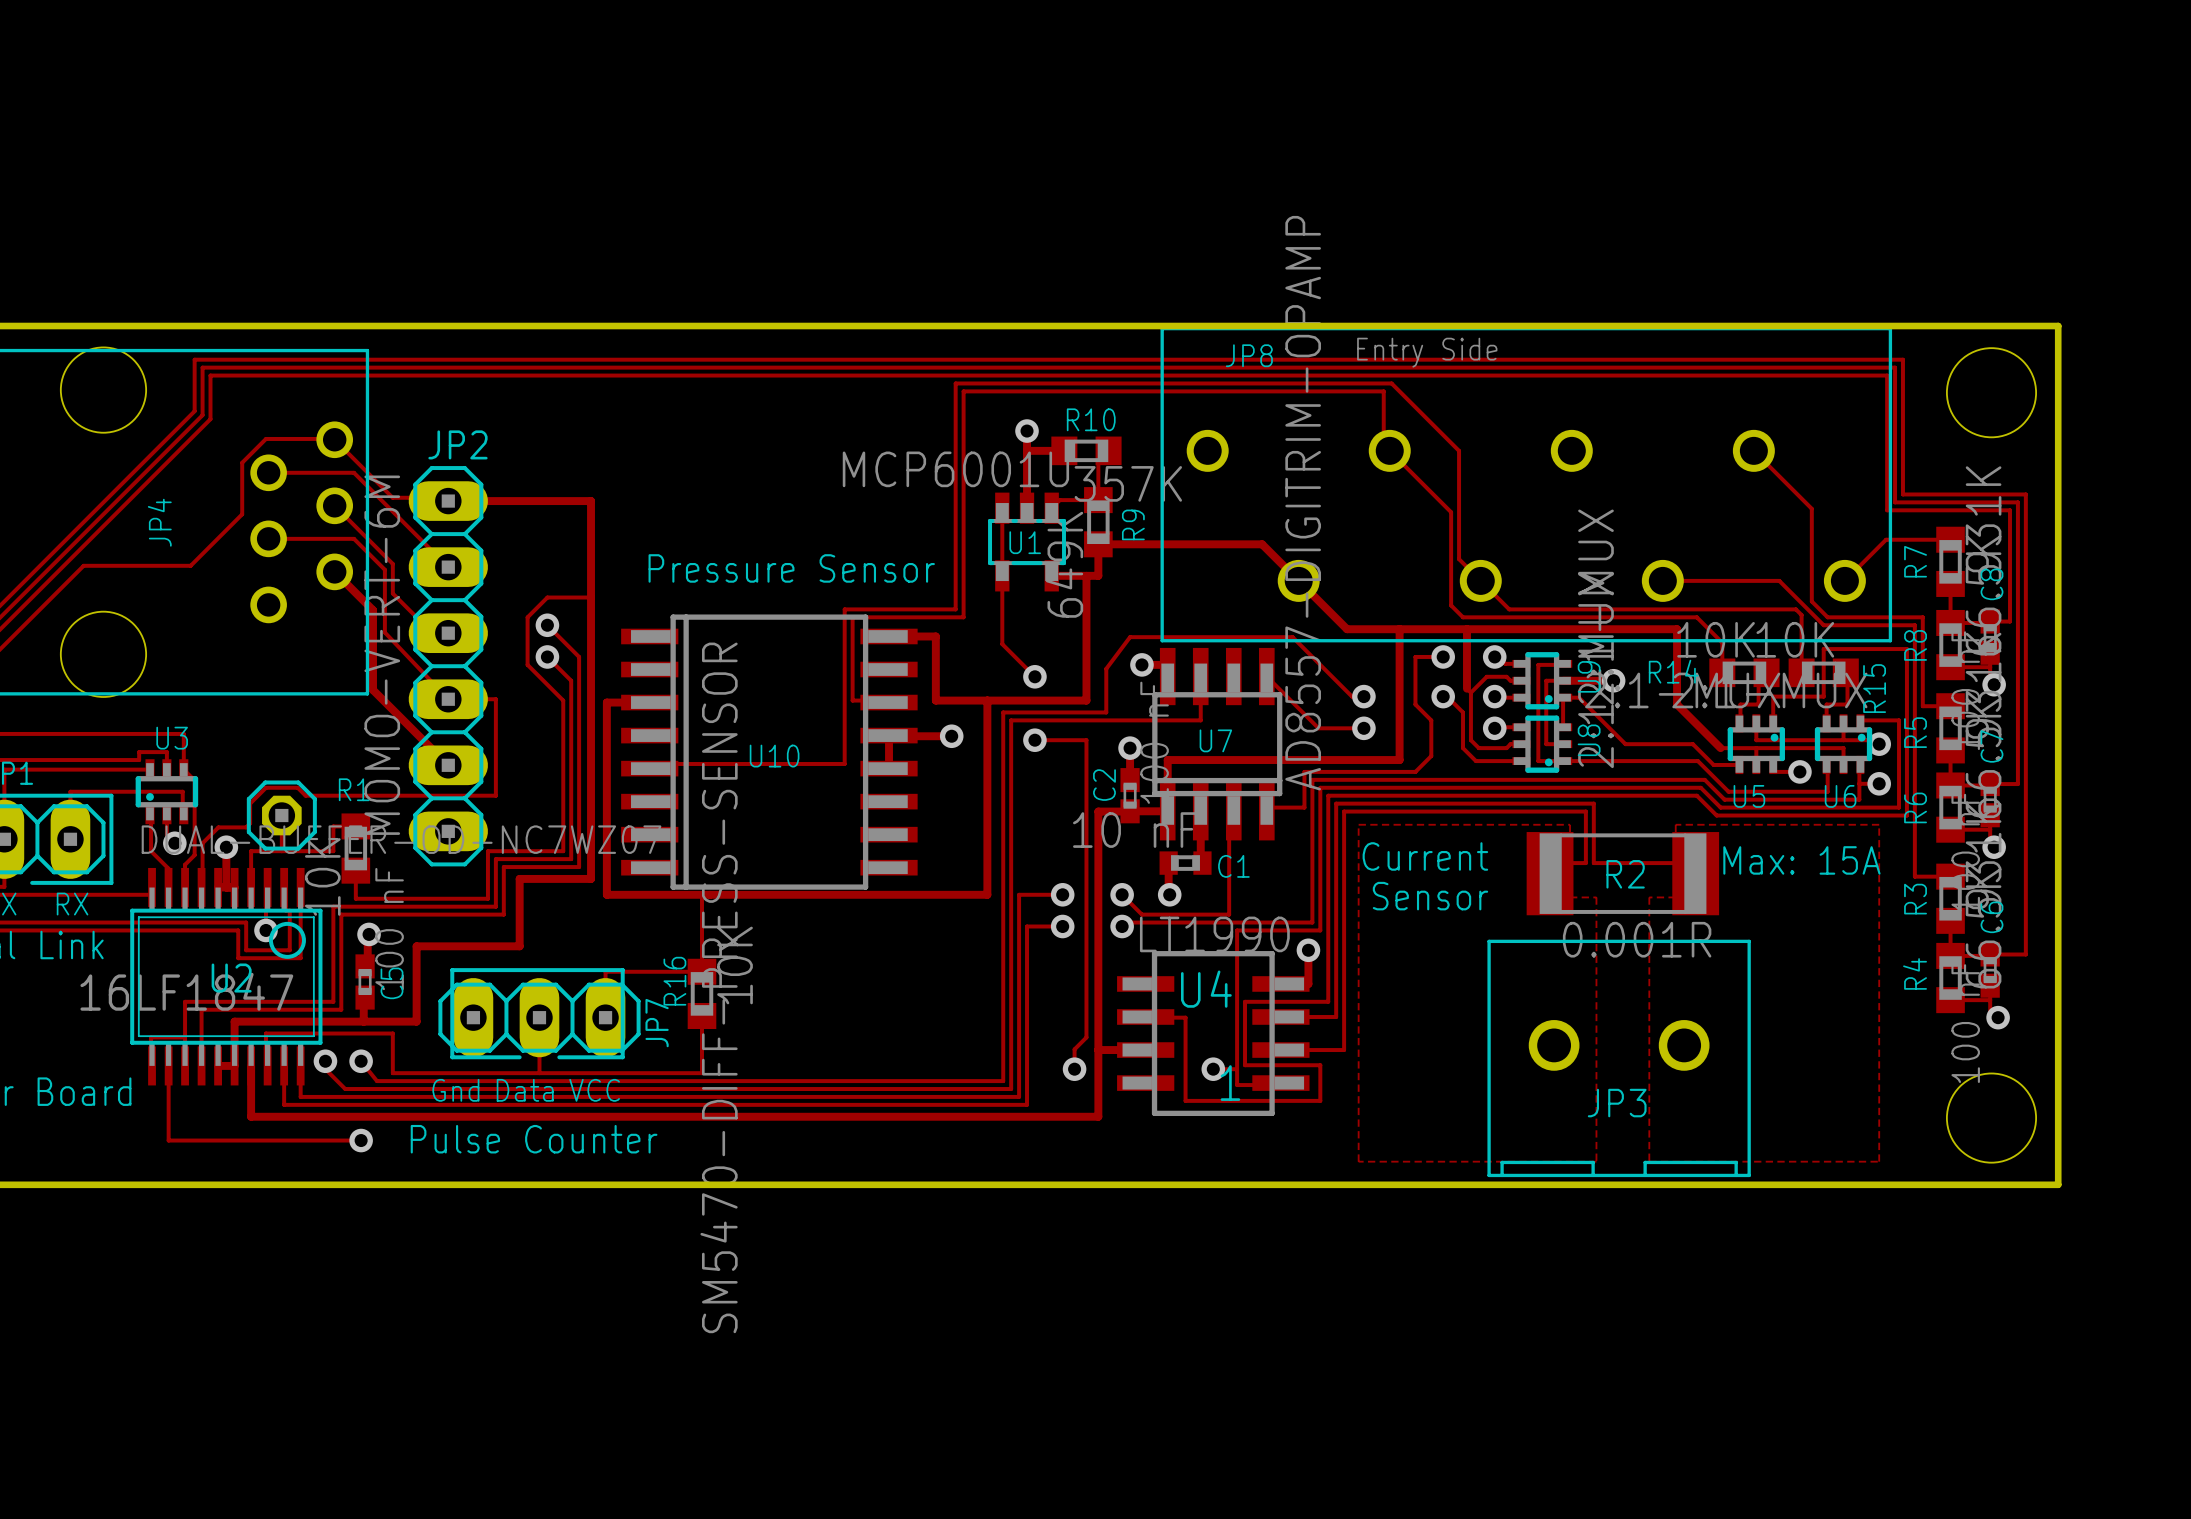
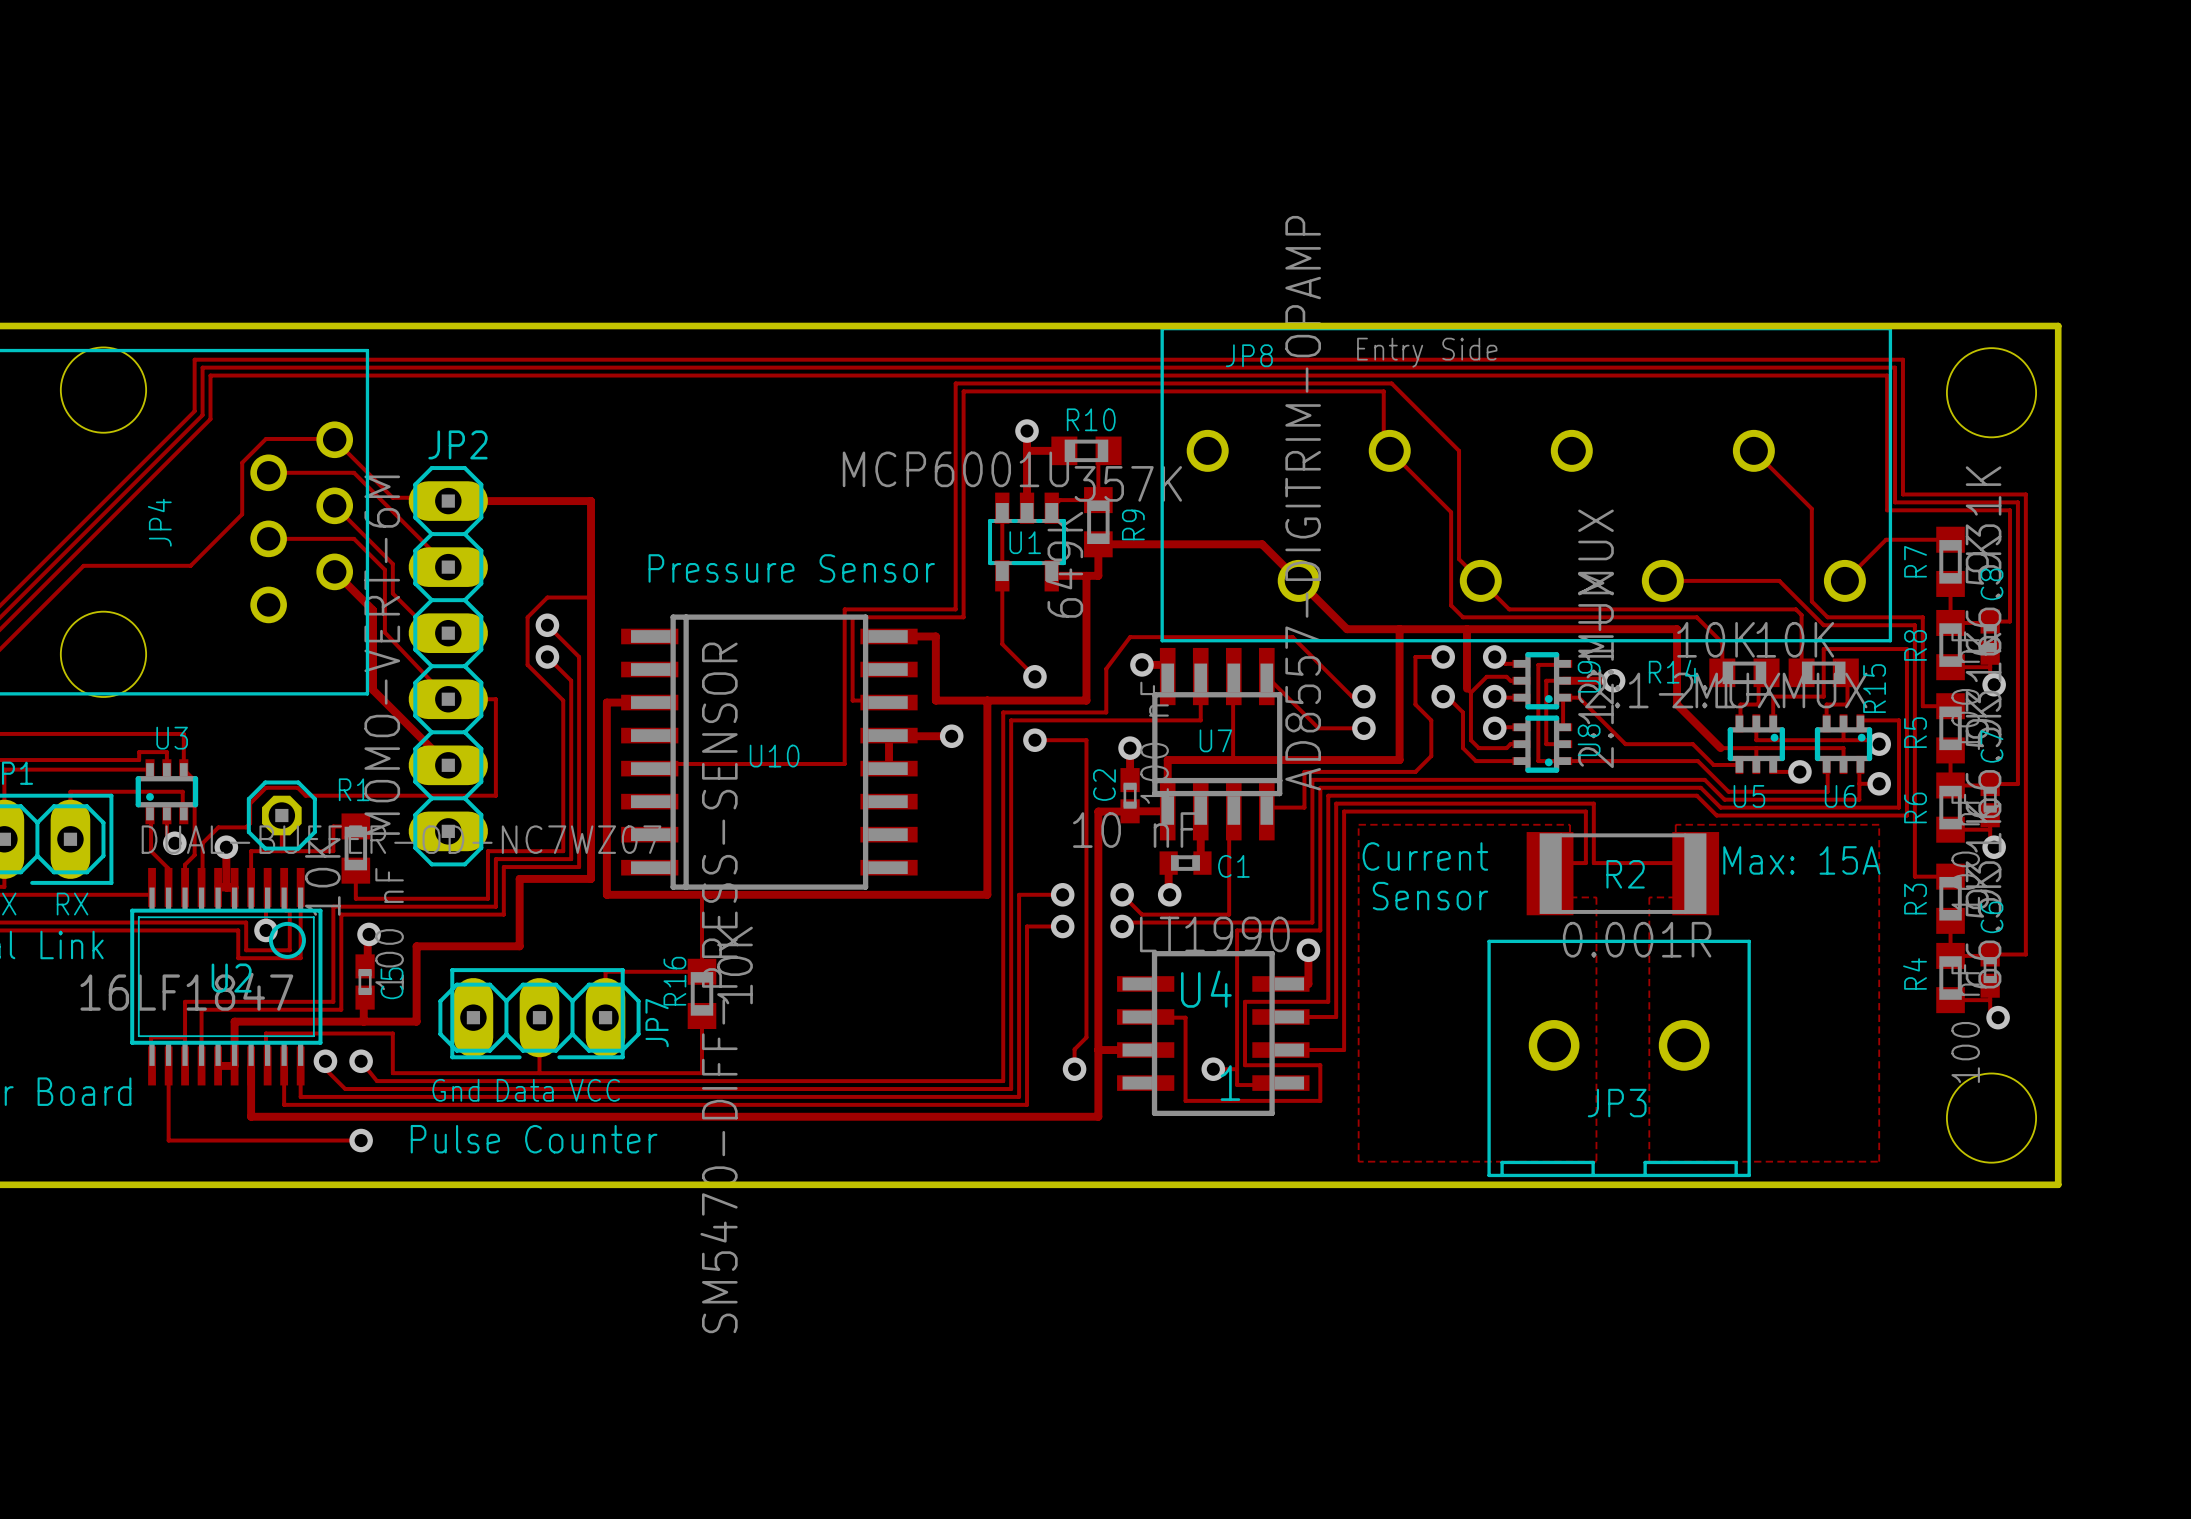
track: none -> (1233, 676) (1233, 760)

